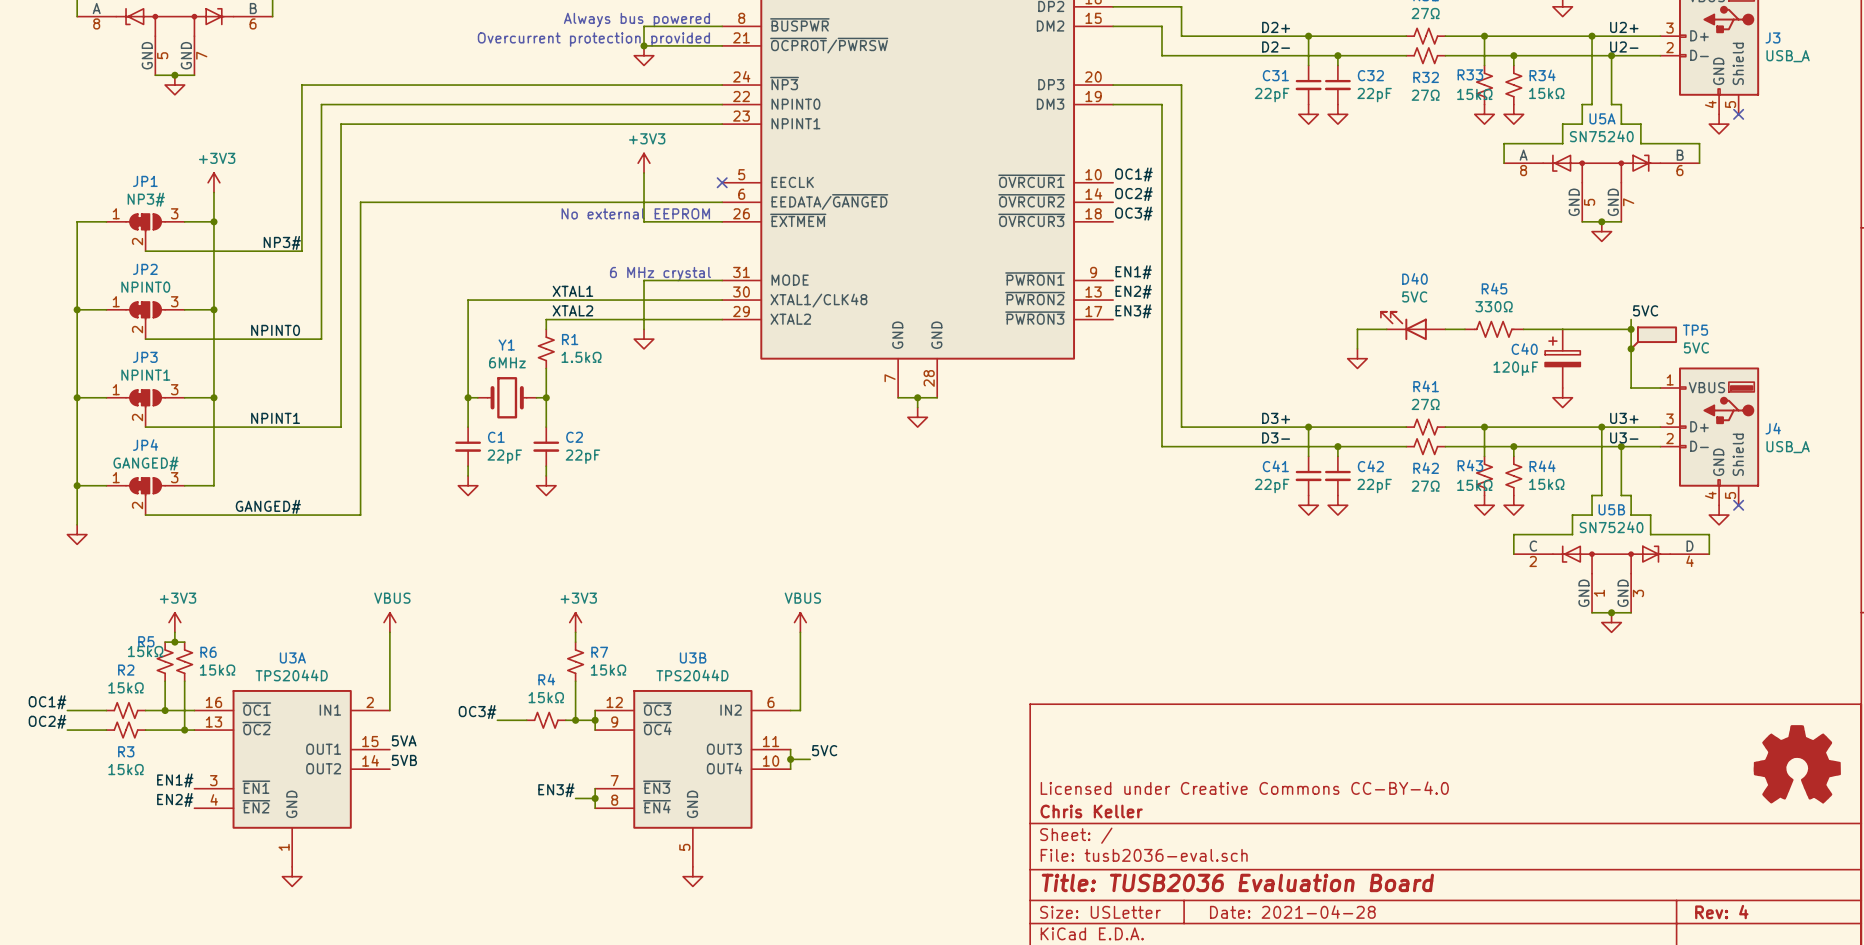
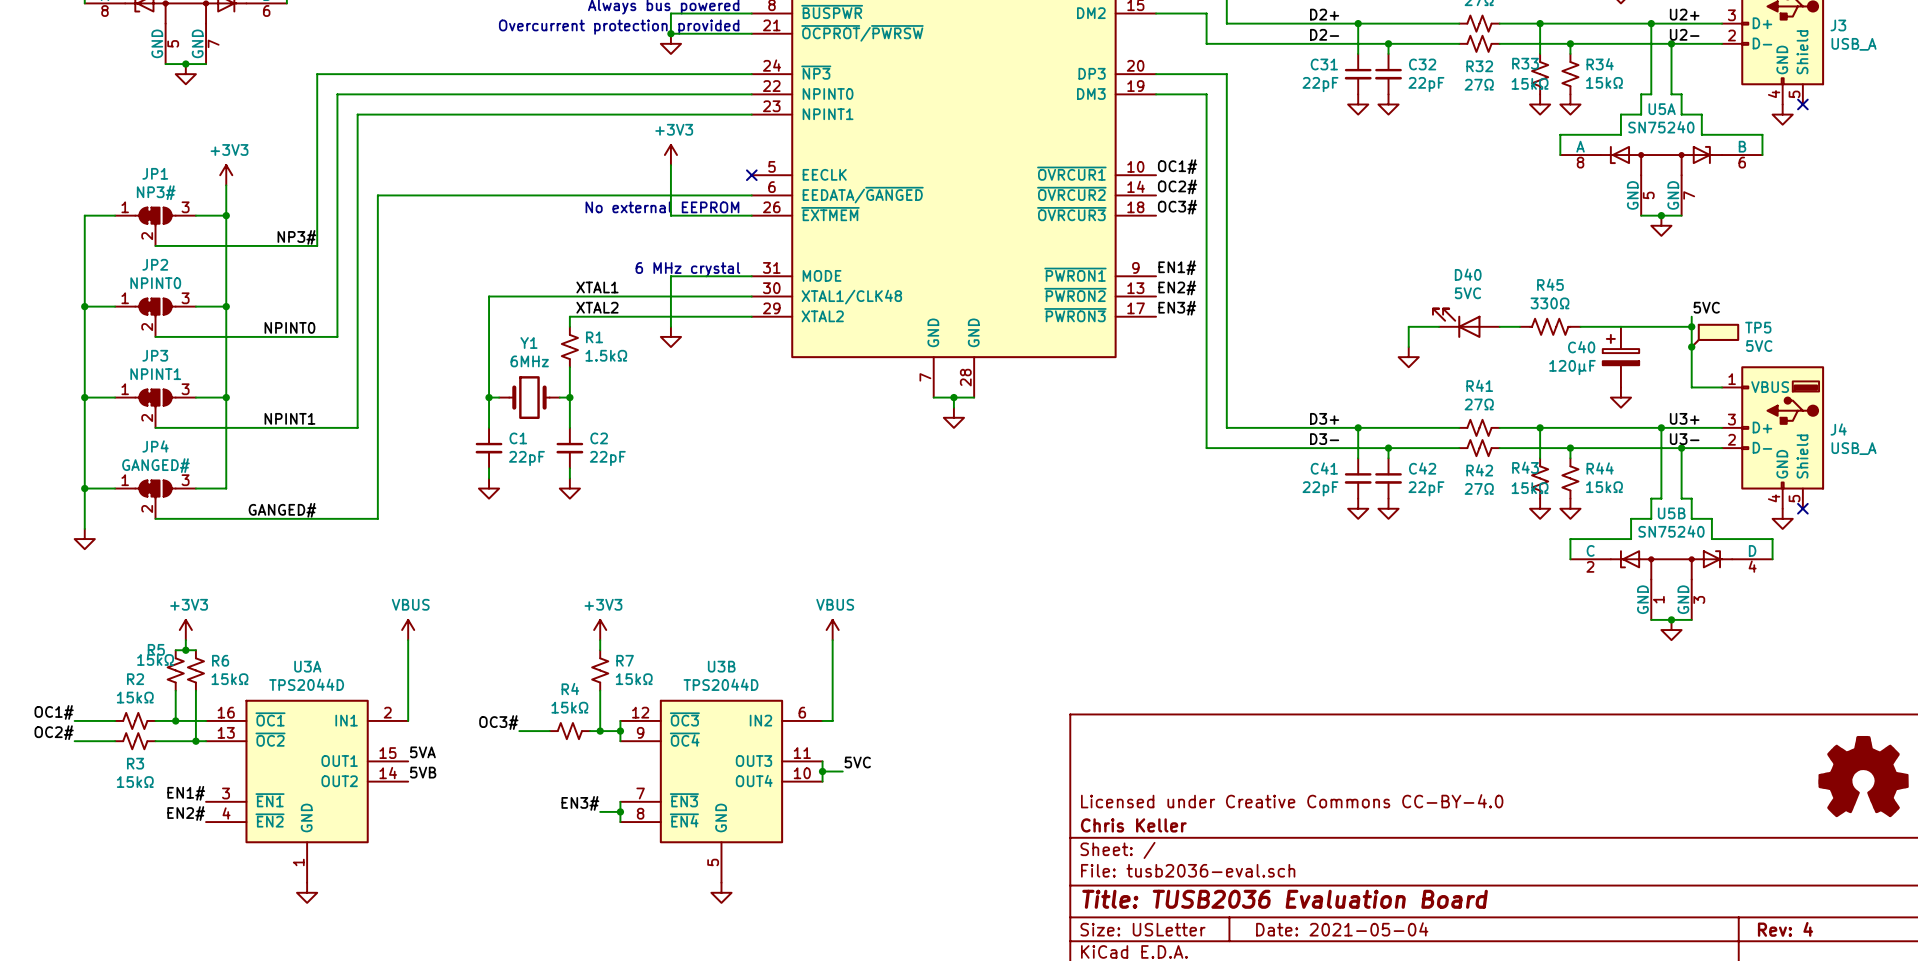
title block: Date: 2021-04-28 (1292, 912) -> Date: 2021-05-04 (1342, 929)

